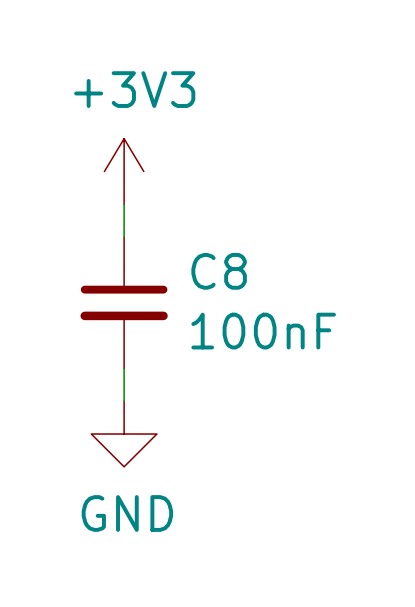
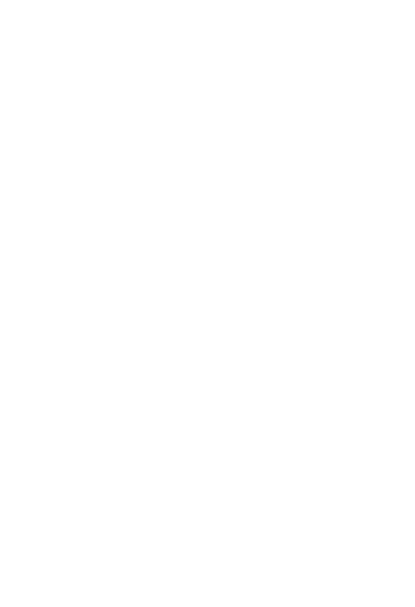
power symbol: +3V3 (124, 171) -> none
wire: (124, 204) (124, 237) -> none
C8: 100nF (124, 302) -> none
wire: (124, 368) (124, 401) -> none
power symbol: GND (124, 434) -> none

